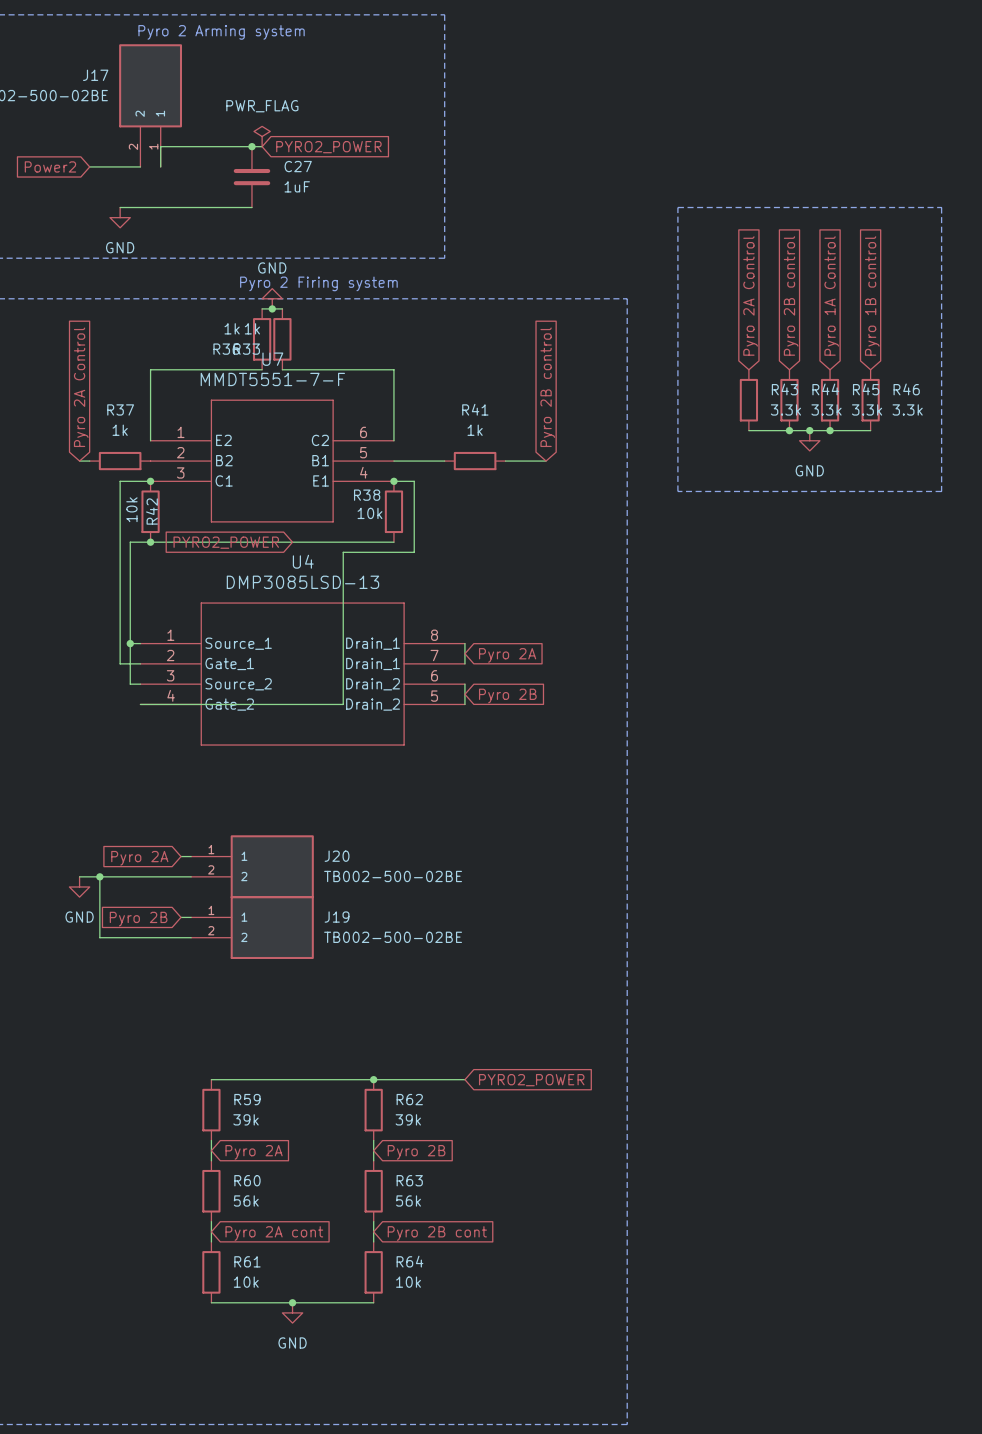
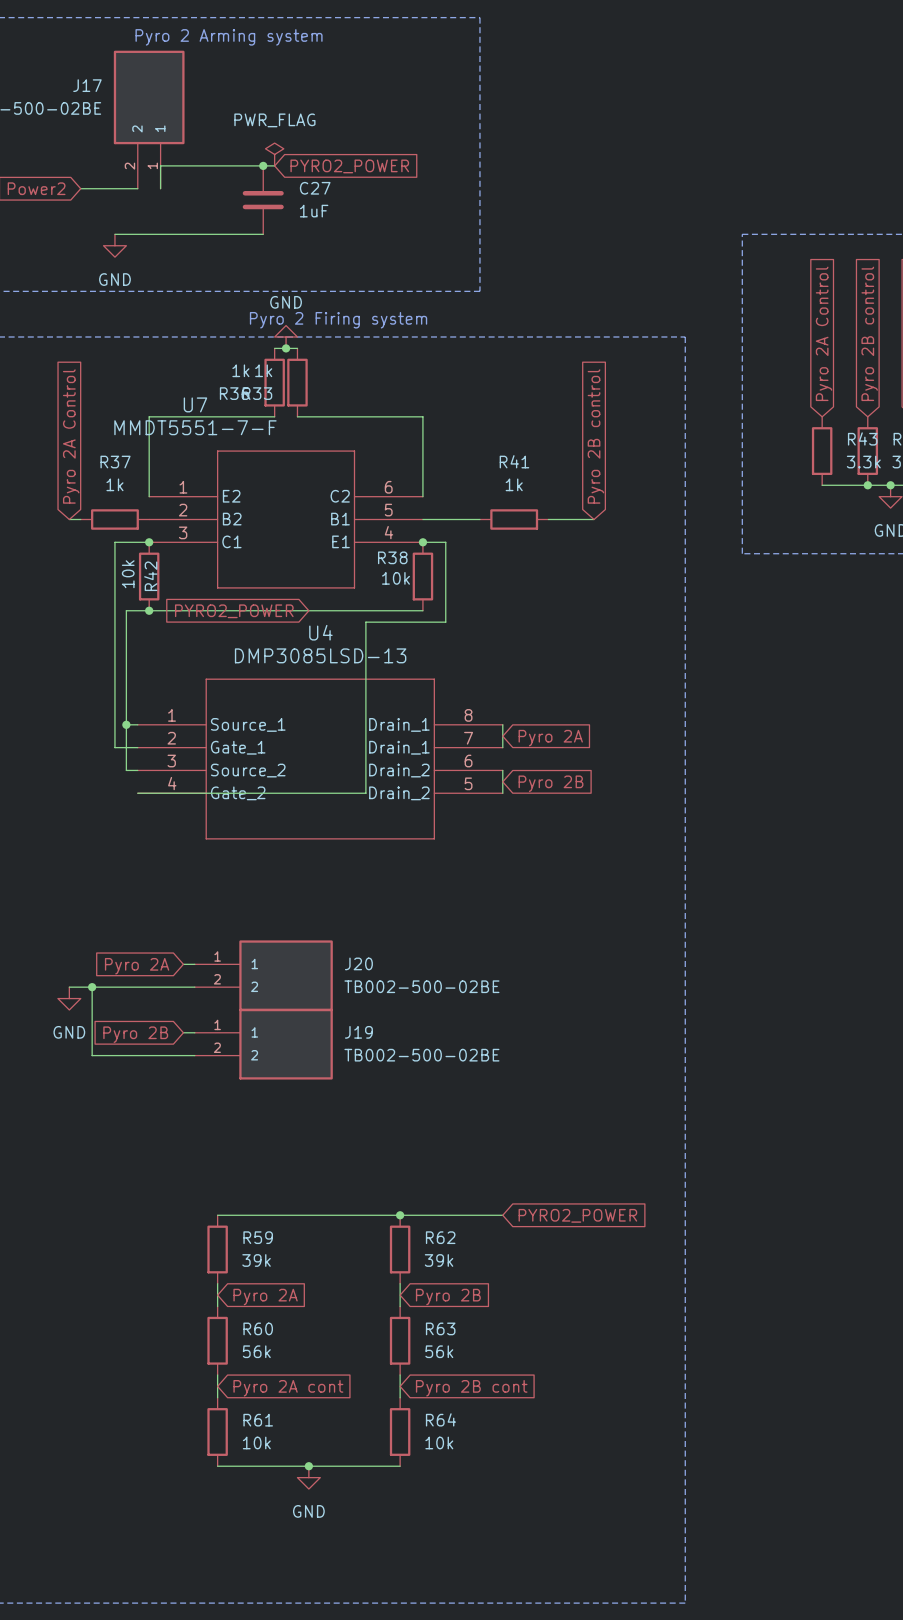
U7 name position: U7 (272, 359) -> U7 (195, 404)
U7 value position: MMDT5551-7-F (272, 379) -> MMDT5551-7-F (195, 427)

